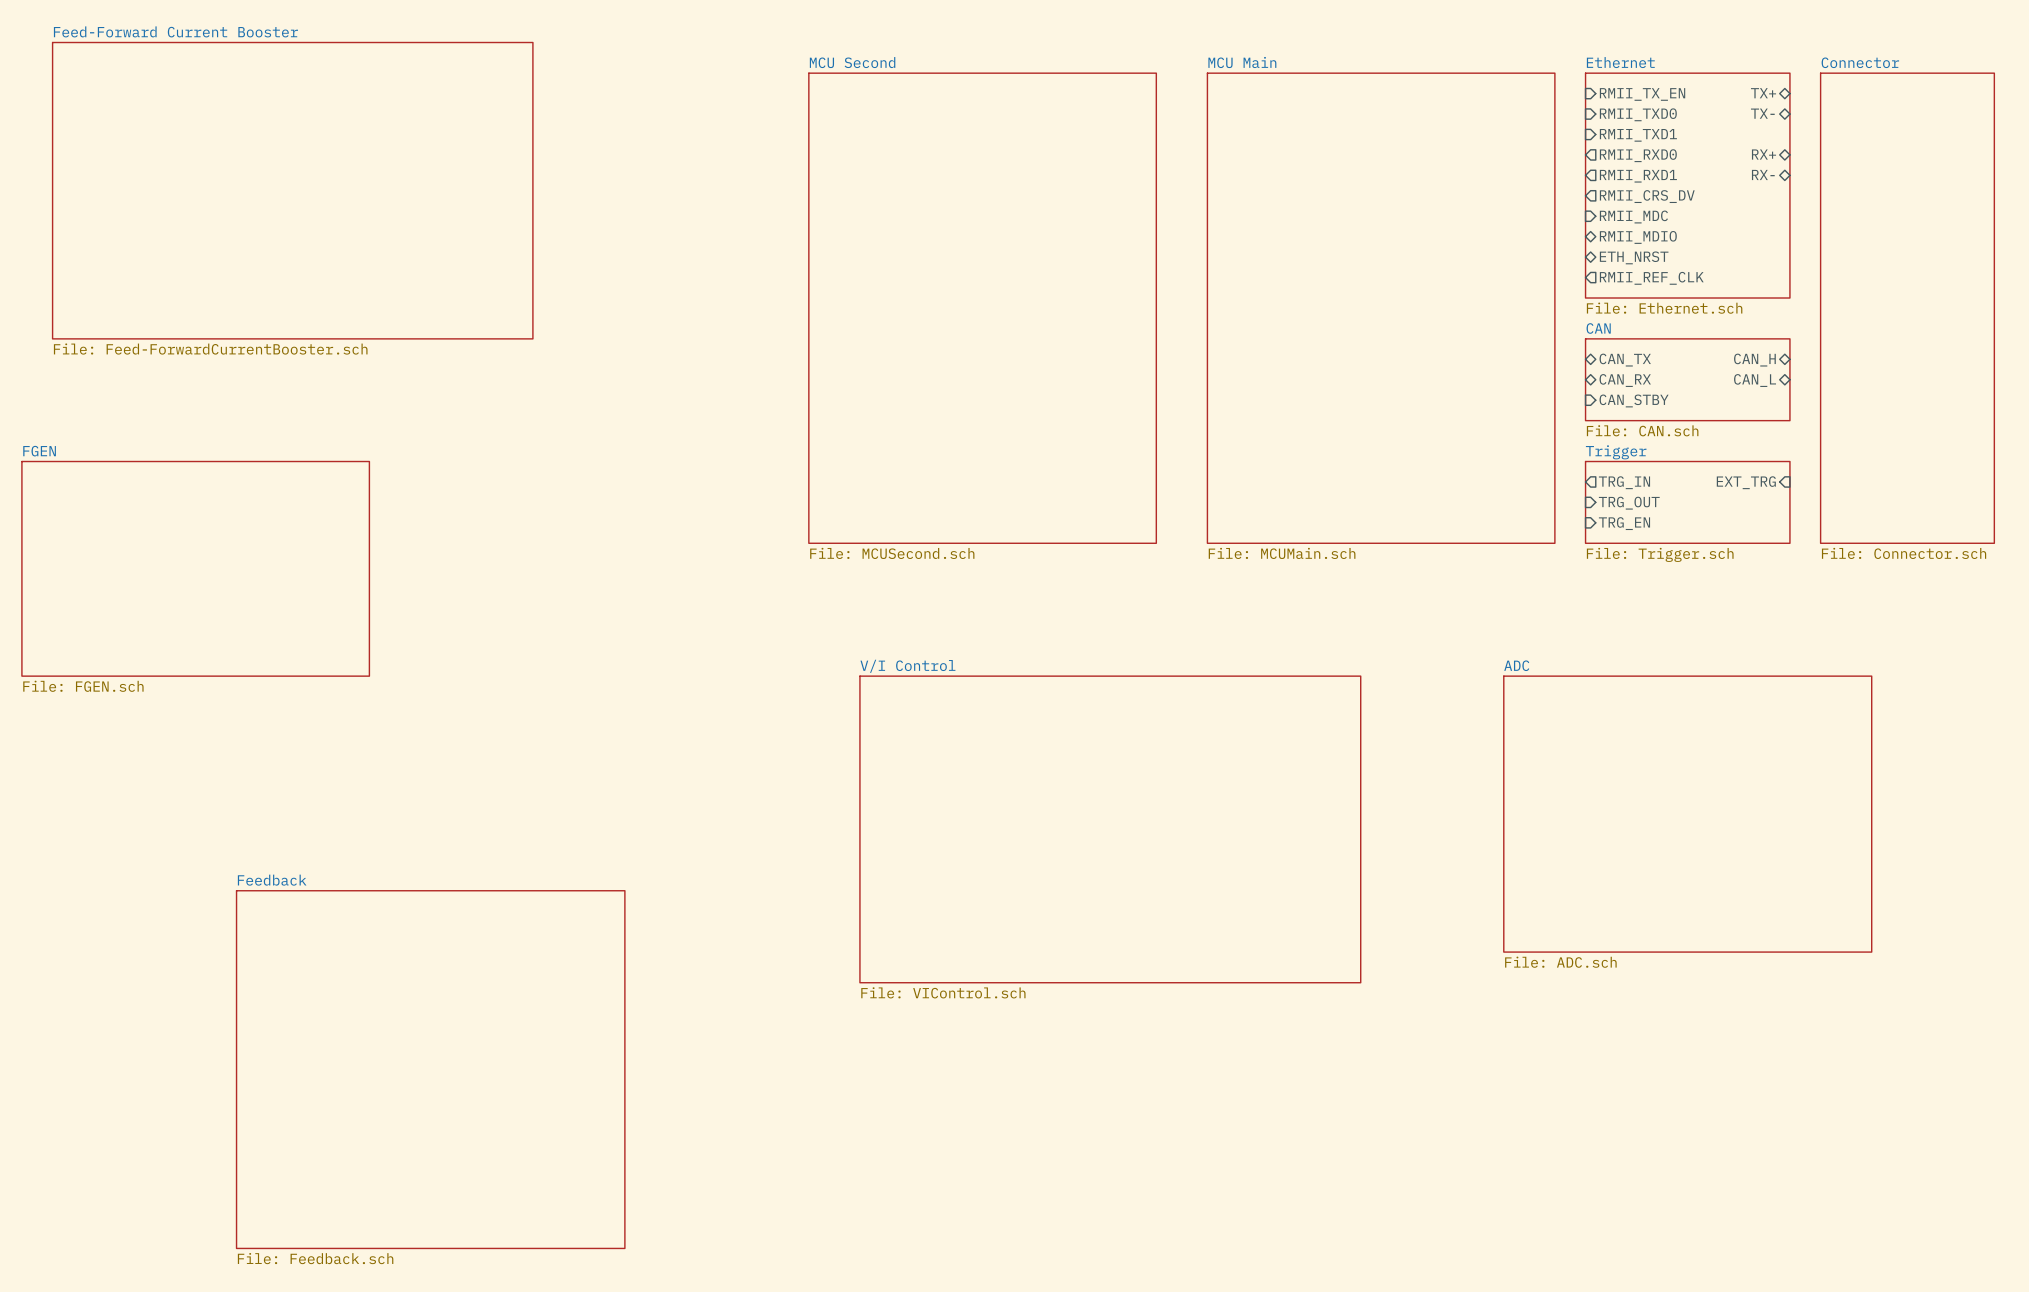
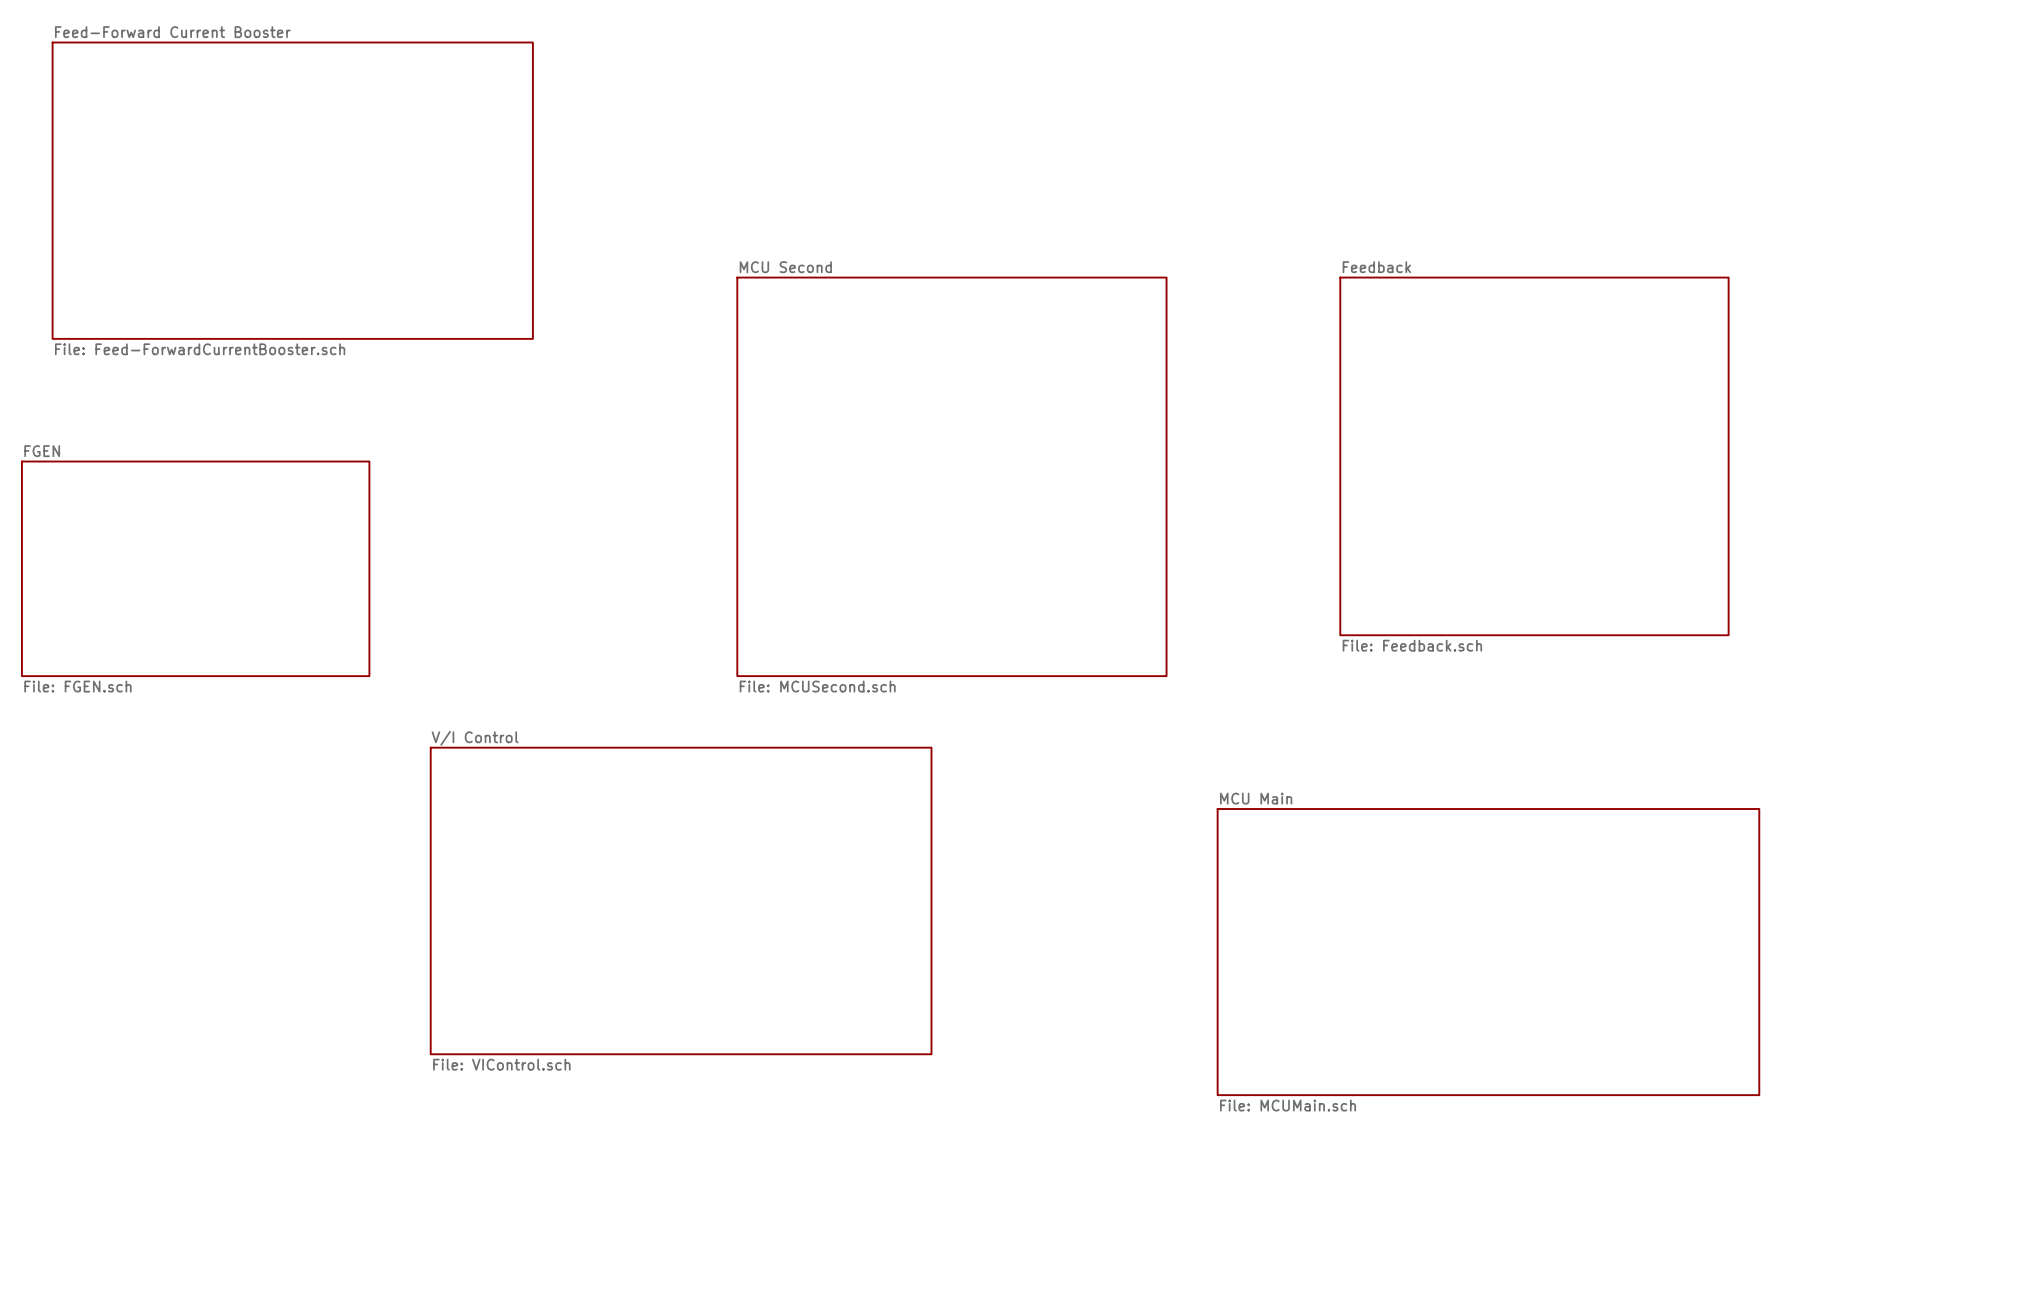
sheet pin: TX+ (1763, 93) -> none
sheet pin: RMII_TX_EN (1642, 94) -> none
sheet pin: TX- (1762, 113) -> none
sheet pin: RMII_TXD0 (1638, 114) -> none
sheet pin: RMII_TXD1 (1638, 135) -> none
sheet pin: RX+ (1763, 154) -> none
sheet pin: RMII_RXD0 (1638, 155) -> none
sheet pin: RX- (1763, 174) -> none
sheet pin: RMII_RXD1 (1638, 176) -> none
sheet Ethernet: File: Ethernet.sch (1687, 185) -> none
sheet pin: RMII_CRS_DV (1647, 196) -> none
sheet pin: RMII_MDC (1633, 217) -> none
sheet pin: RMII_MDIO (1638, 237) -> none
sheet pin: ETH_NRST (1634, 257) -> none
sheet pin: RMII_REF_CLK (1651, 278) -> none
sheet MCU Second: File: MCUSecond.sch (982, 308) -> none
sheet MCU Main: File: MCUMain.sch (1381, 308) -> none
sheet Connector: File: Connector.sch (1907, 308) -> none
sheet pin: CAN_TX (1625, 360) -> none
sheet pin: CAN_H (1754, 360) -> none
sheet CAN: File: CAN.sch (1687, 379) -> none
sheet pin: CAN_RX (1625, 380) -> none
sheet pin: CAN_L (1755, 380) -> none
sheet pin: CAN_STBY (1634, 400) -> none
sheet Feedback: none -> File: Feedback.sch (1534, 456)
sheet MCU Second: none -> File: MCUSecond.sch (951, 476)
sheet pin: TRG_IN (1624, 482) -> none
sheet pin: EXT_TRG (1746, 482) -> none
sheet Trigger: File: Trigger.sch (1687, 502) -> none
sheet pin: TRG_OUT (1629, 503) -> none
sheet pin: TRG_EN (1624, 523) -> none
sheet ADC: File: ADC.sch (1687, 814) -> none
sheet V/I Control: File: VIControl.sch (1110, 829) -> none
sheet V/I Control: none -> File: VIControl.sch (681, 900)
sheet MCU Main: none -> File: MCUMain.sch (1488, 952)
sheet Feedback: File: Feedback.sch (430, 1069) -> none

